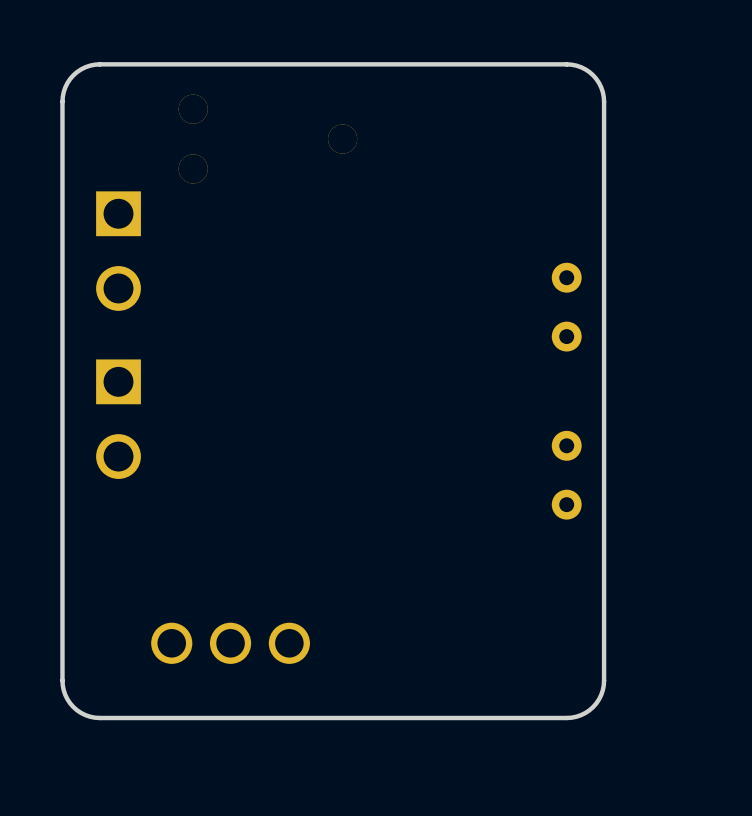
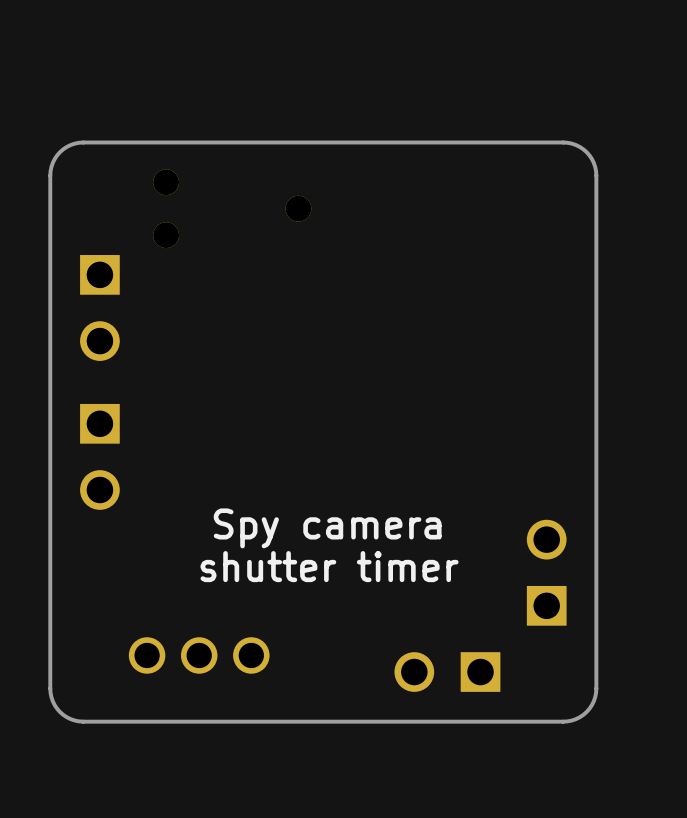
board edge: (566, 64) (581, 67) (593, 75) (601, 87) (604, 101) (604, 680) (601, 694) (593, 707) (581, 715) (566, 718) -> (497, 142) (571, 143) (586, 152) (593, 162) (596, 171) (596, 688)
part: (566, 307) -> none
part: (566, 475) -> none
text: none -> Spy camera (327, 528)
text: none -> shutter timer (329, 566)
part: none -> (546, 572)
part: none -> (447, 672)
board edge: none -> (596, 688) (593, 701) (589, 708) (579, 717) (571, 720) (497, 721)

